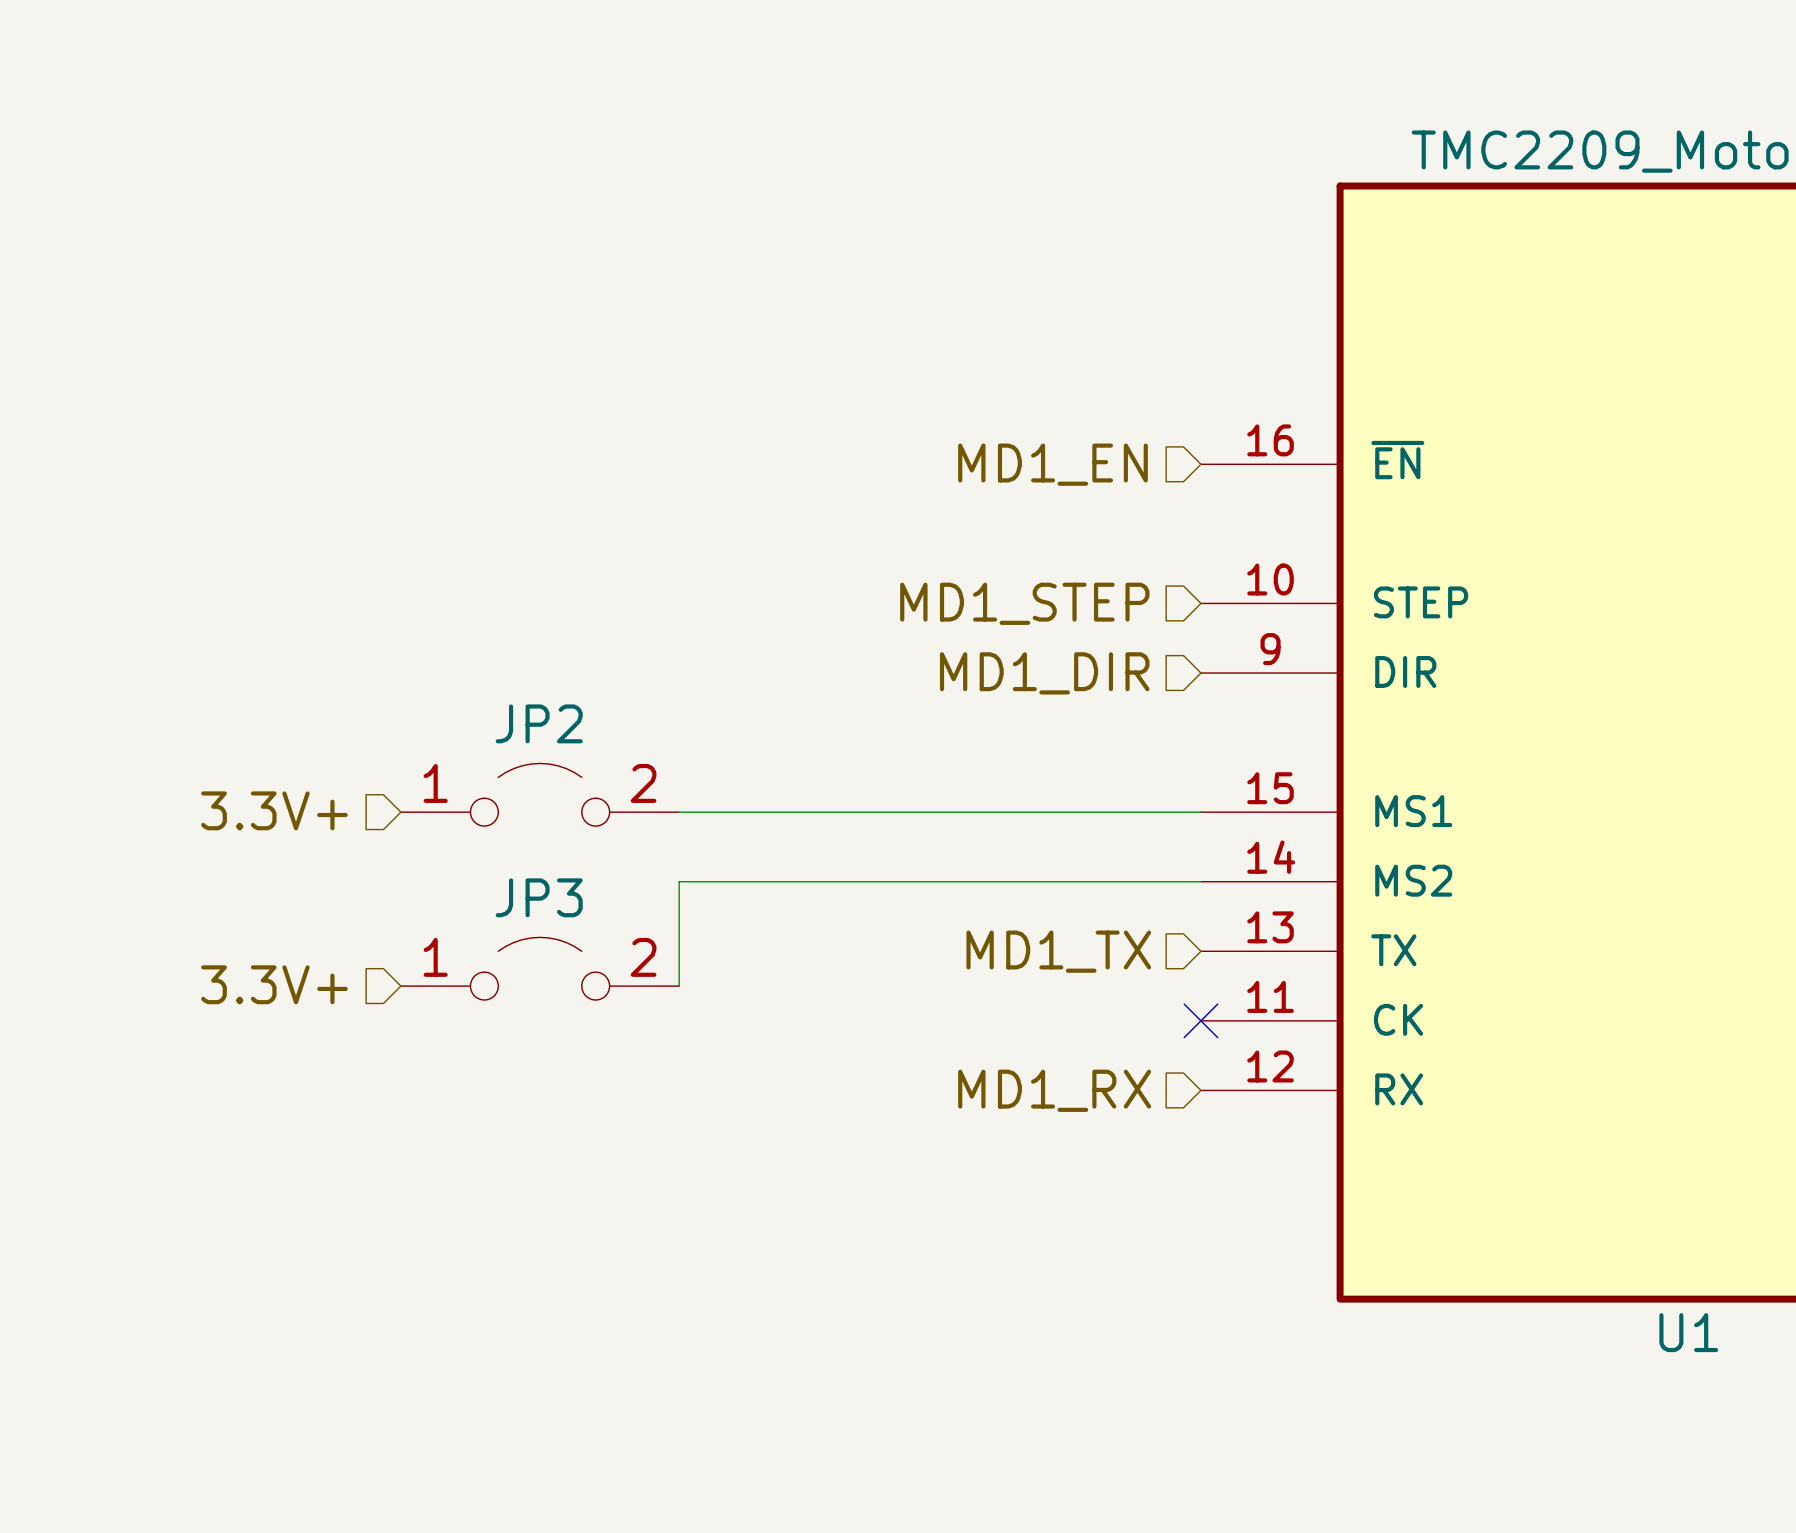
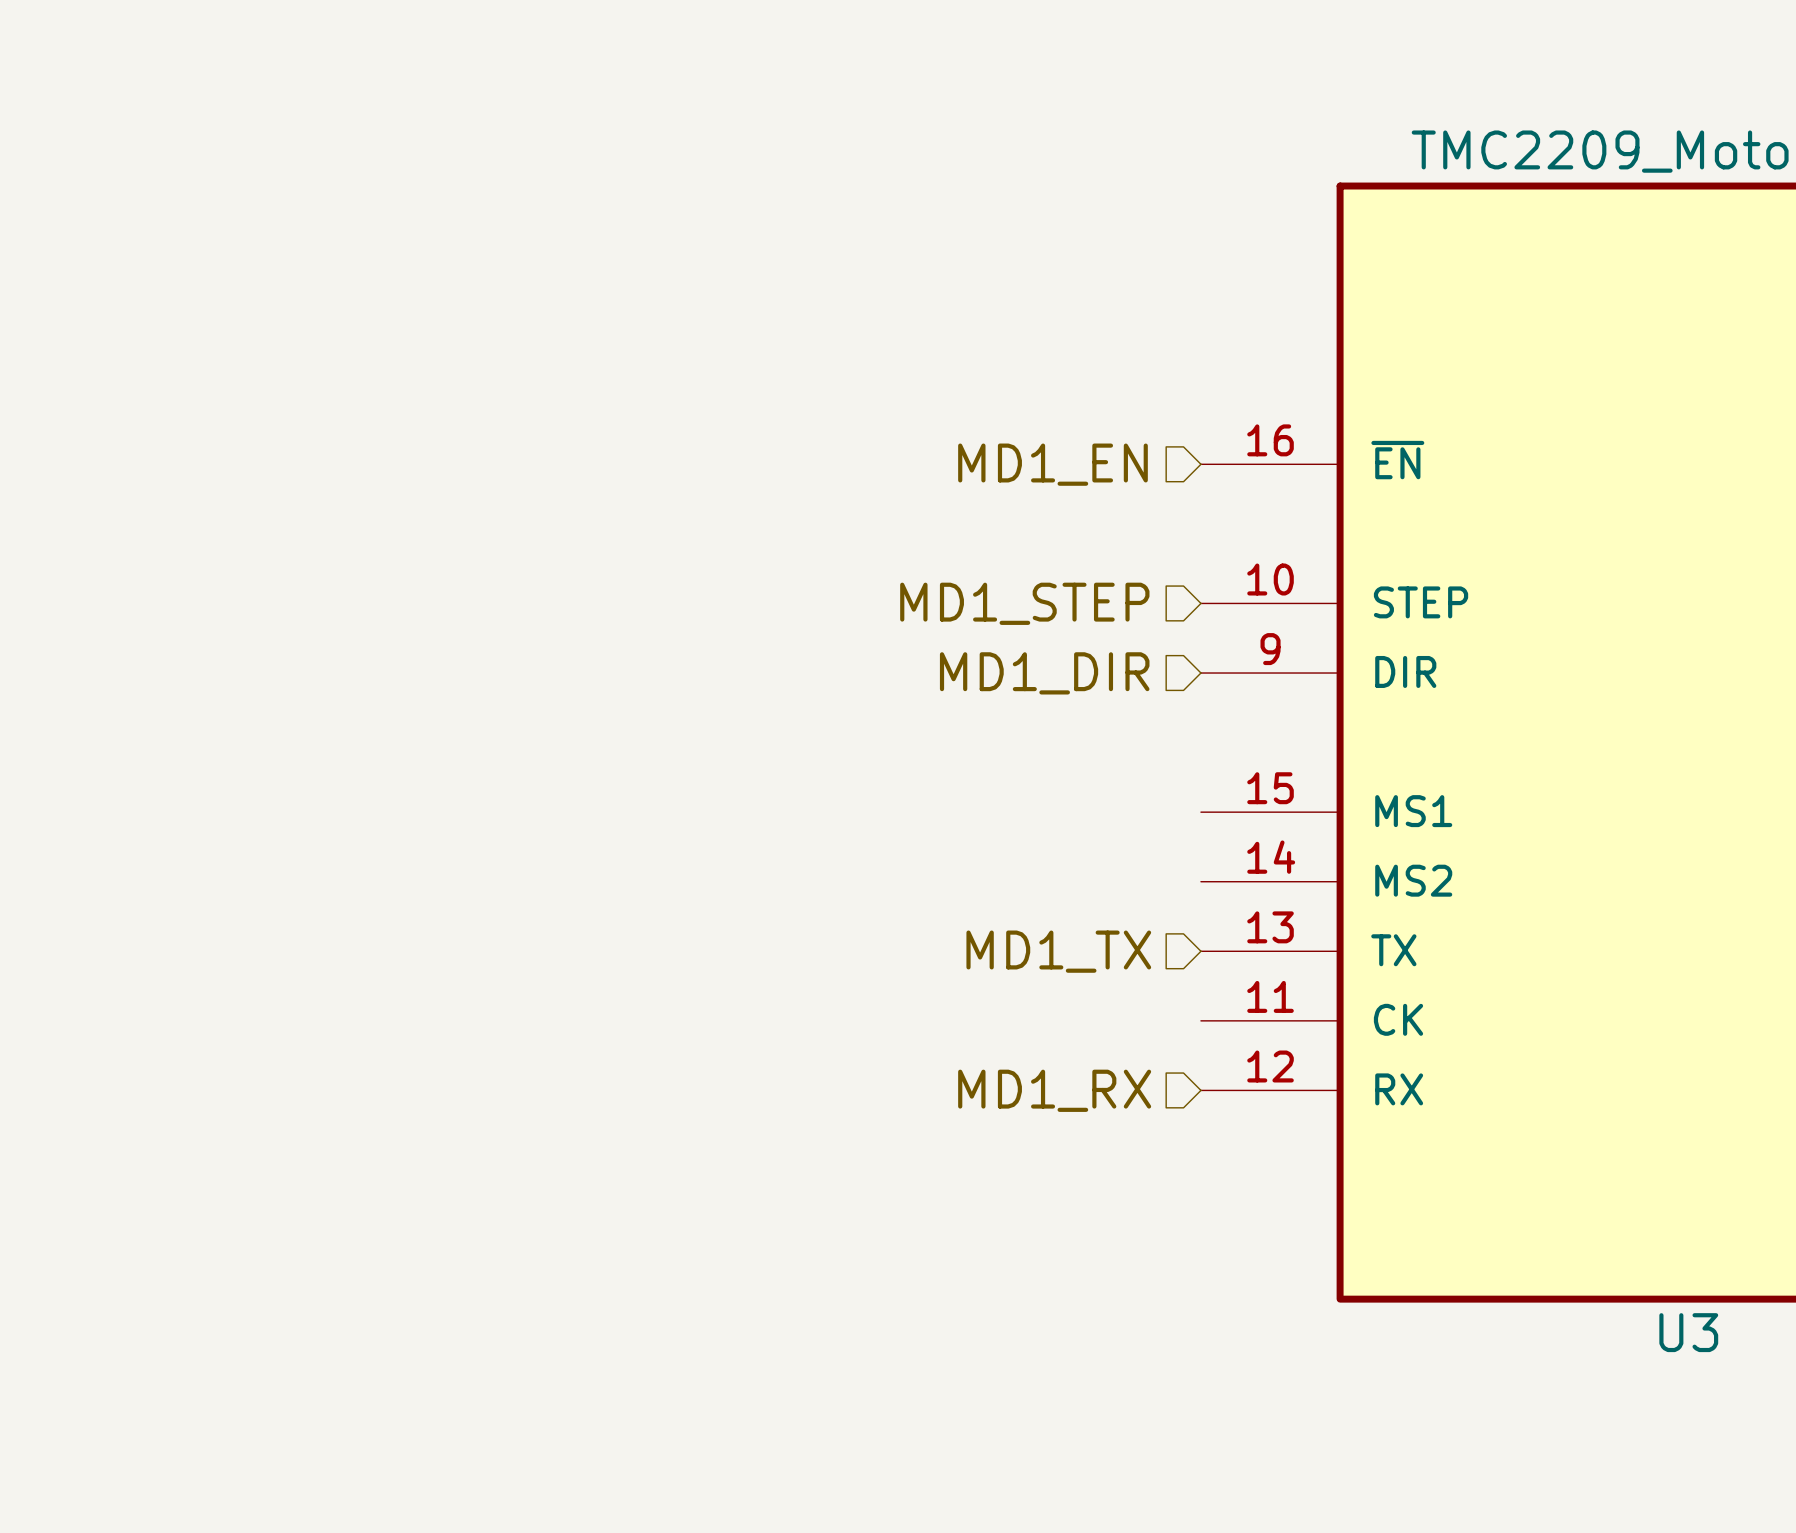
JP2: (540, 794) -> none
hierarchical label: 3.3V+ (274, 810) -> none
wire: (679, 812) (1200, 812) -> none
wire: (1200, 881) (679, 881) (679, 986) -> none
JP3: (540, 968) -> none
hierarchical label: 3.3V+ (274, 984) -> none
no-connect mark: (1200, 1020) -> none
U1 name: U1 (1688, 1332) -> U3 (1688, 1332)

